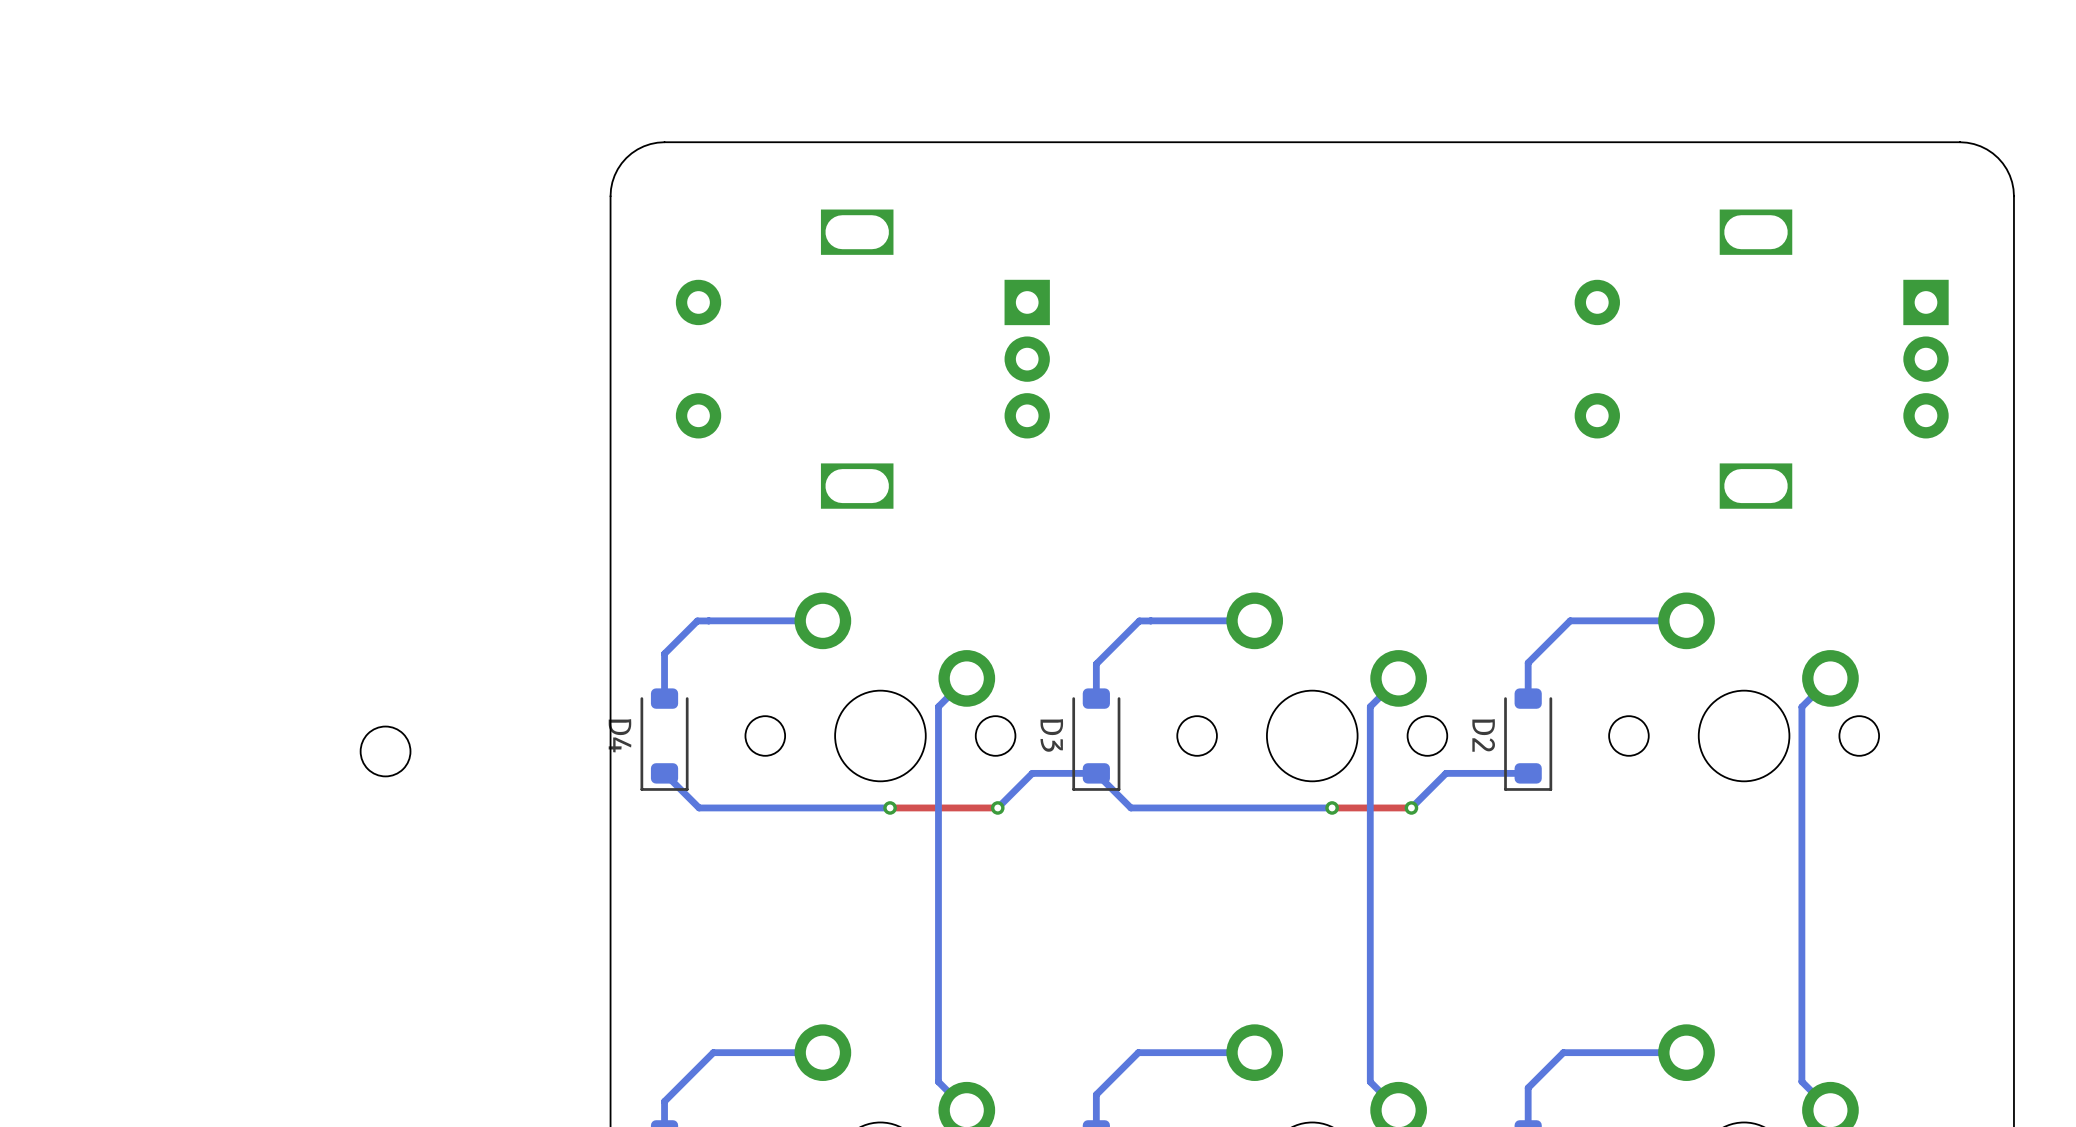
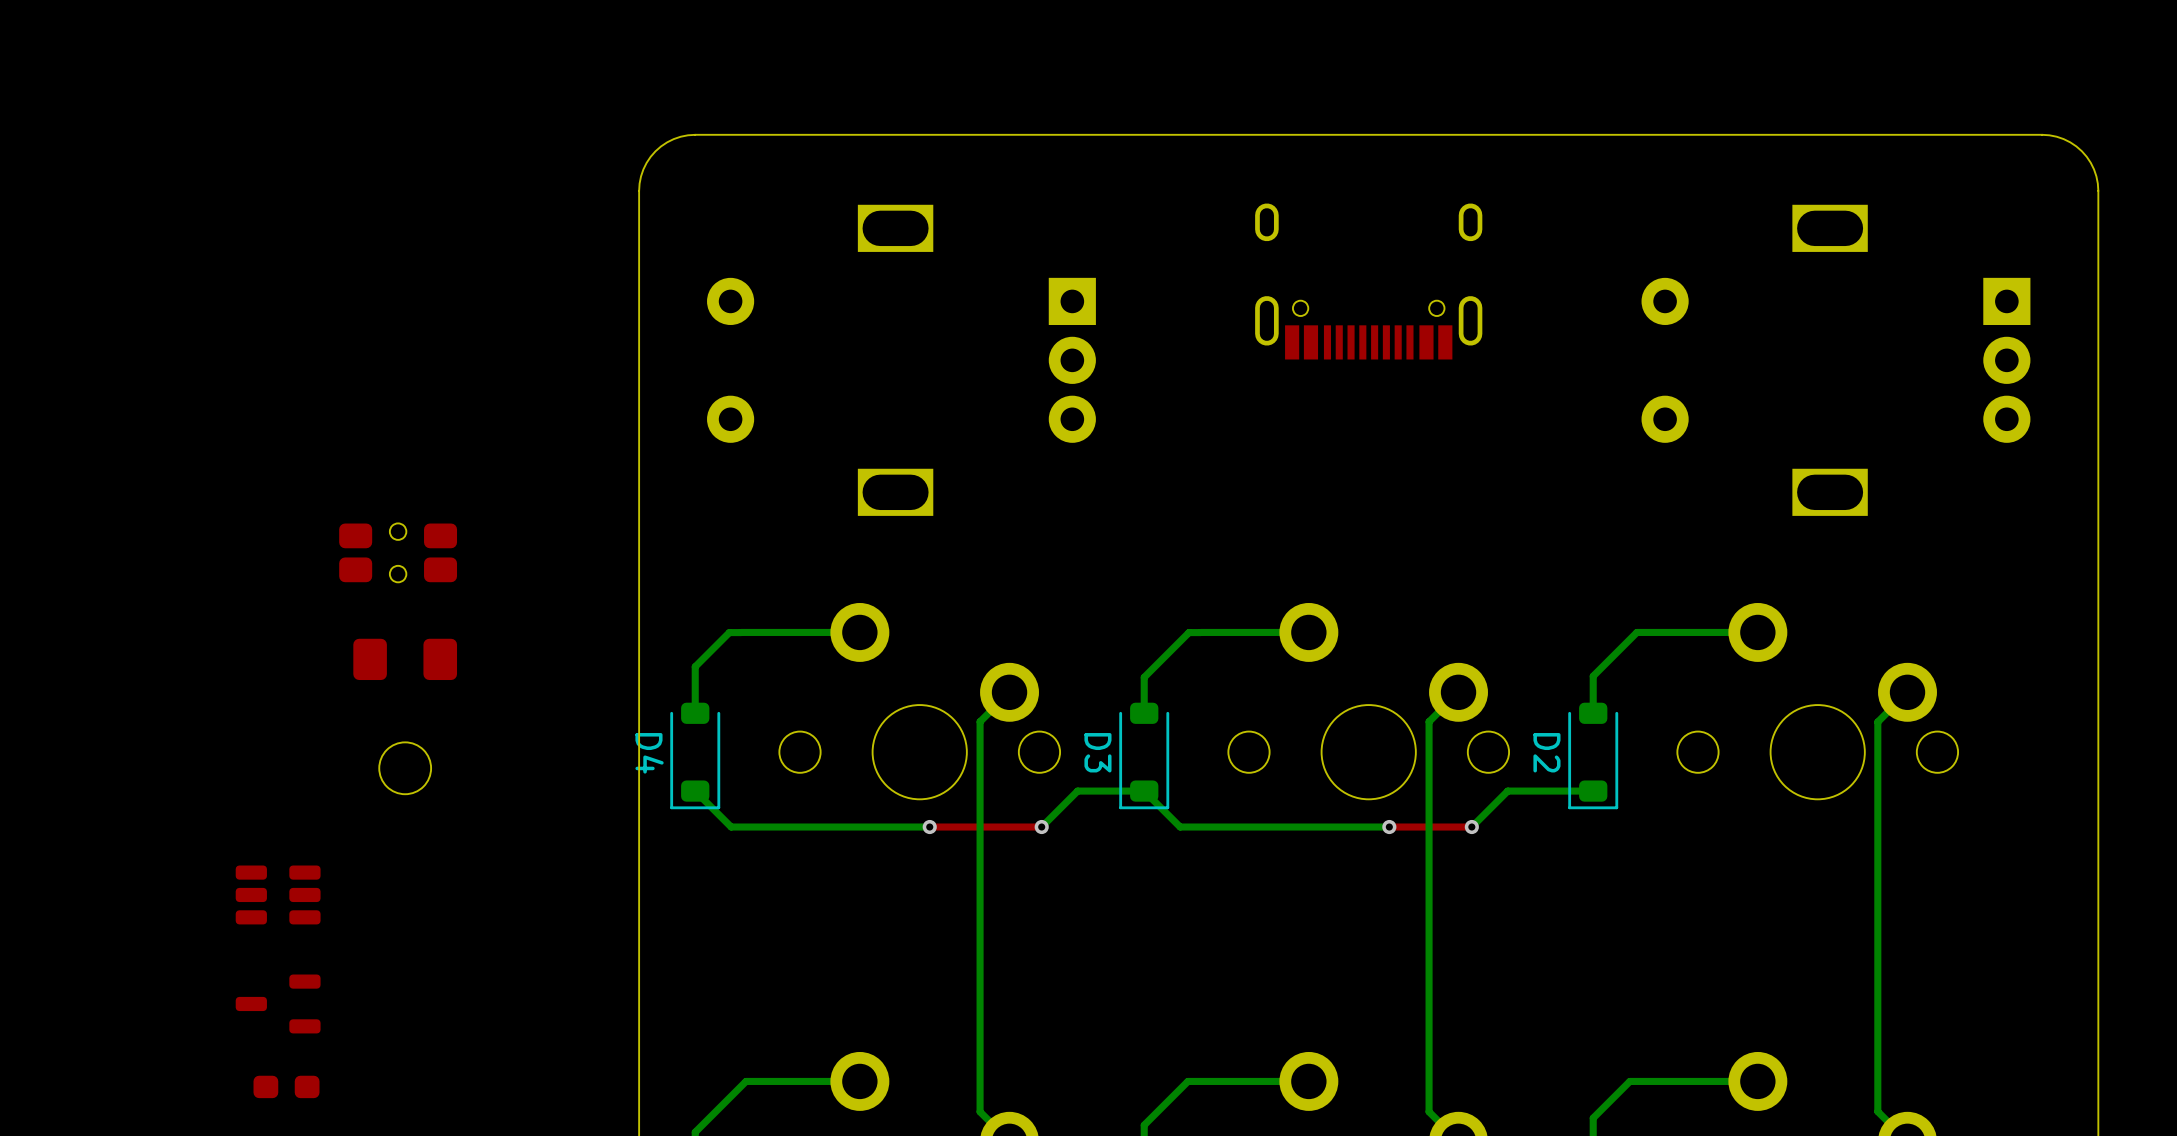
part: none -> (1368, 281)
part: none -> (398, 552)
part: none -> (405, 659)
part: none -> (278, 894)
part: none -> (278, 1003)
part: none -> (286, 1086)

